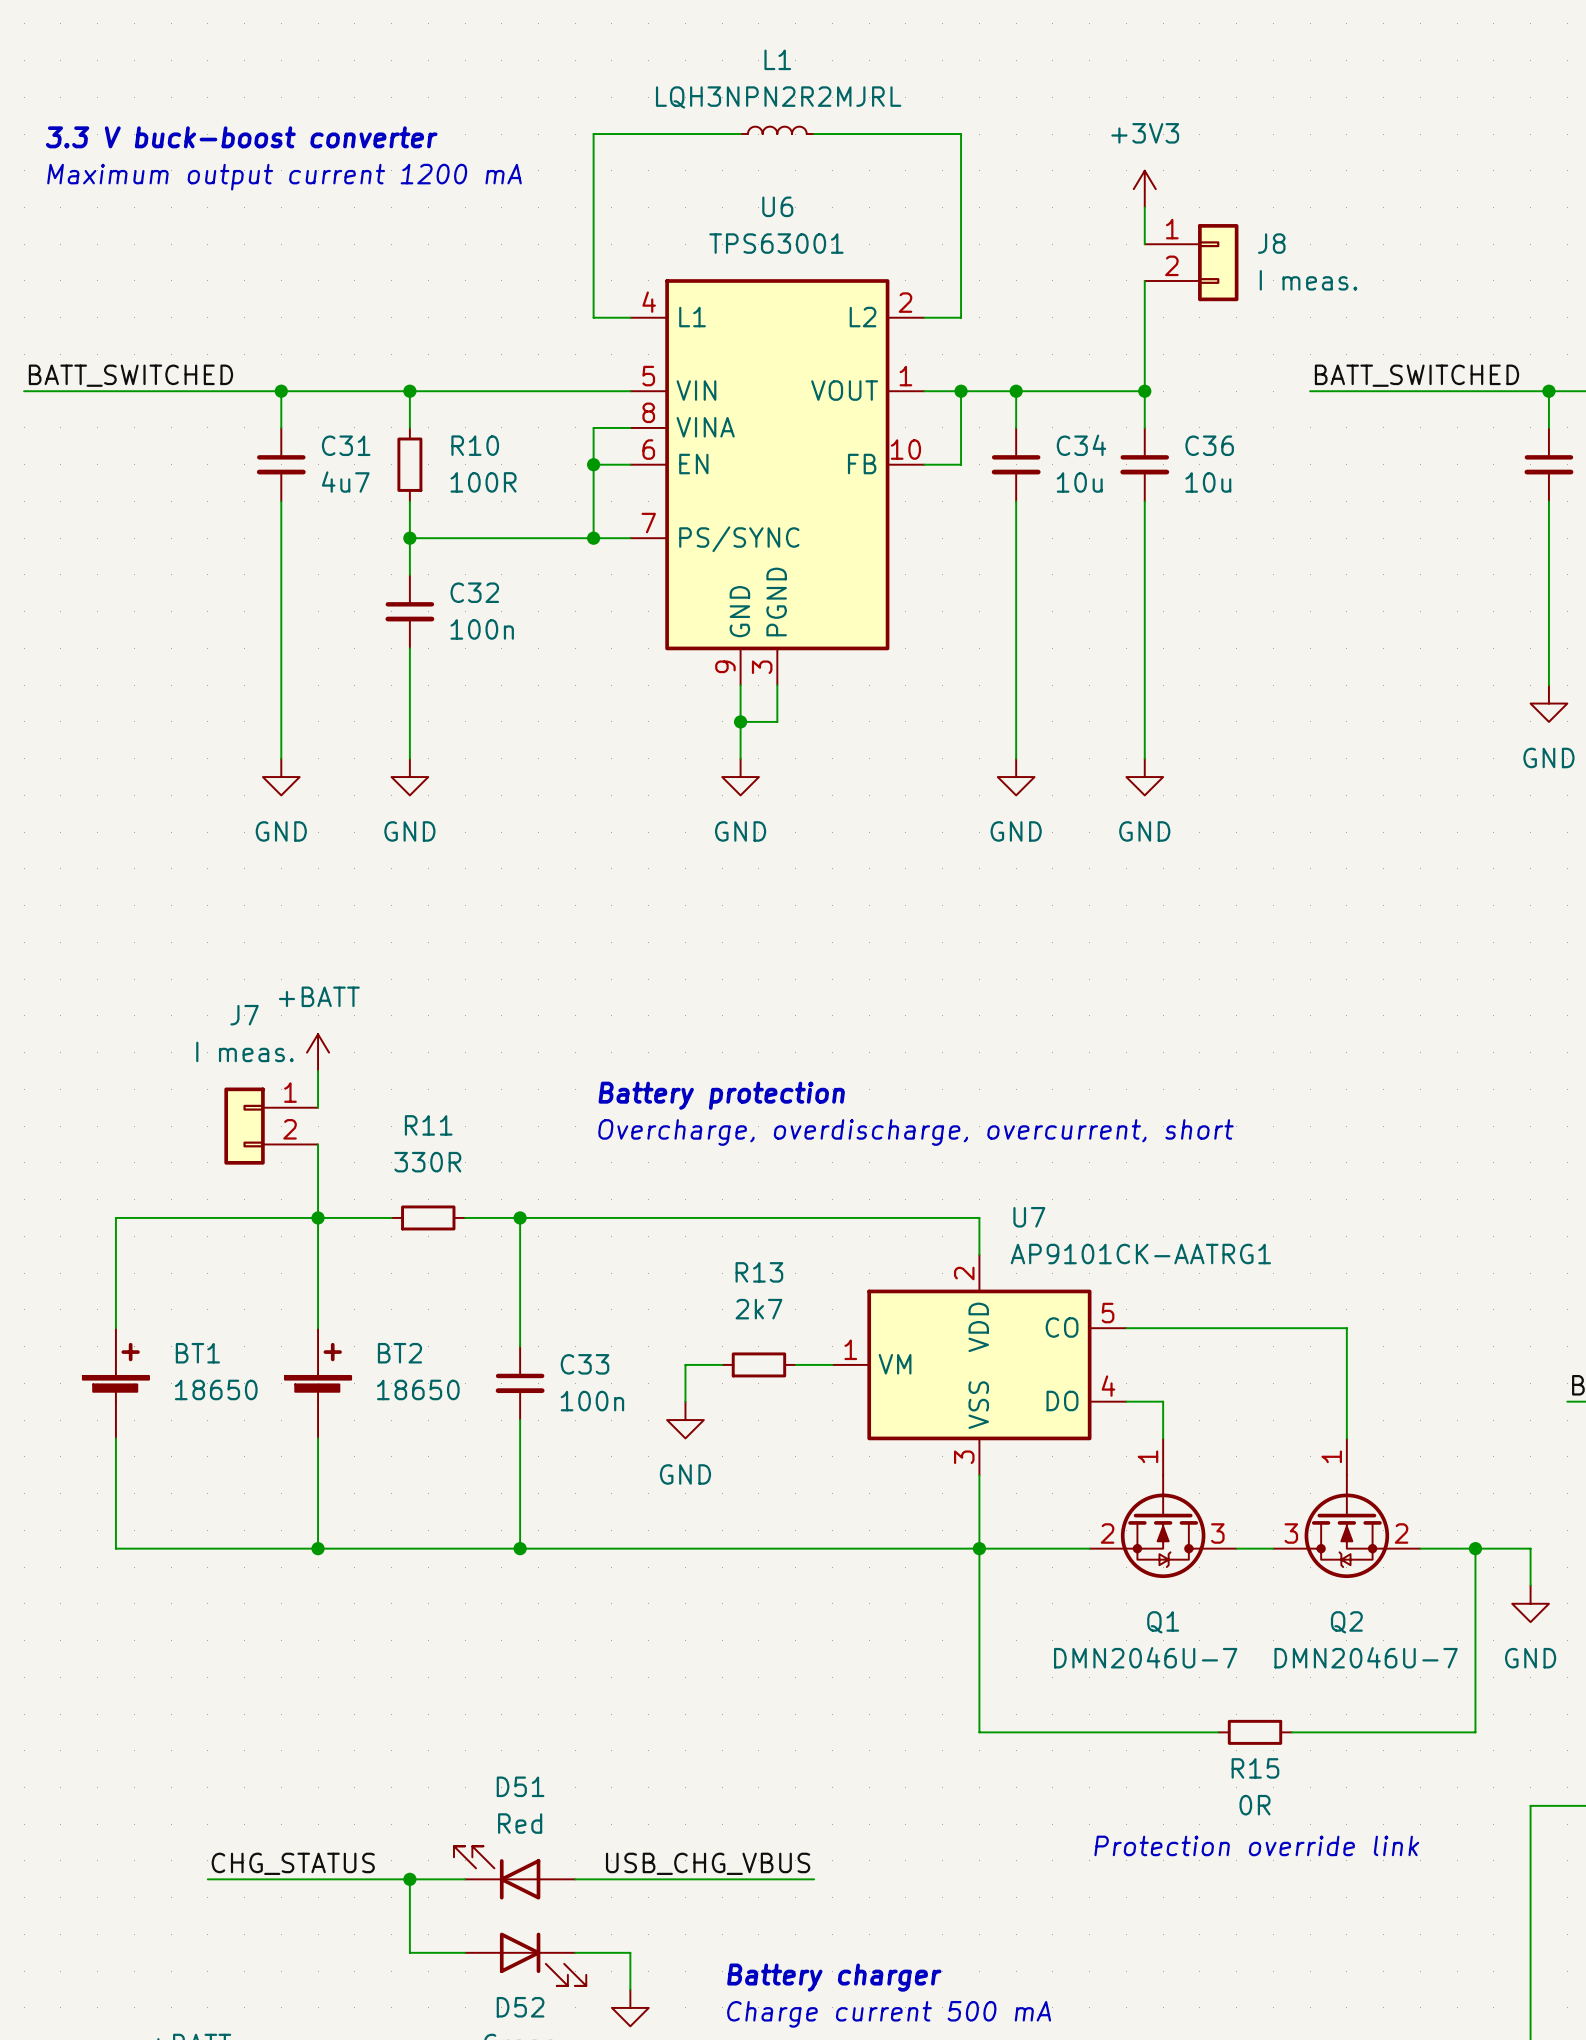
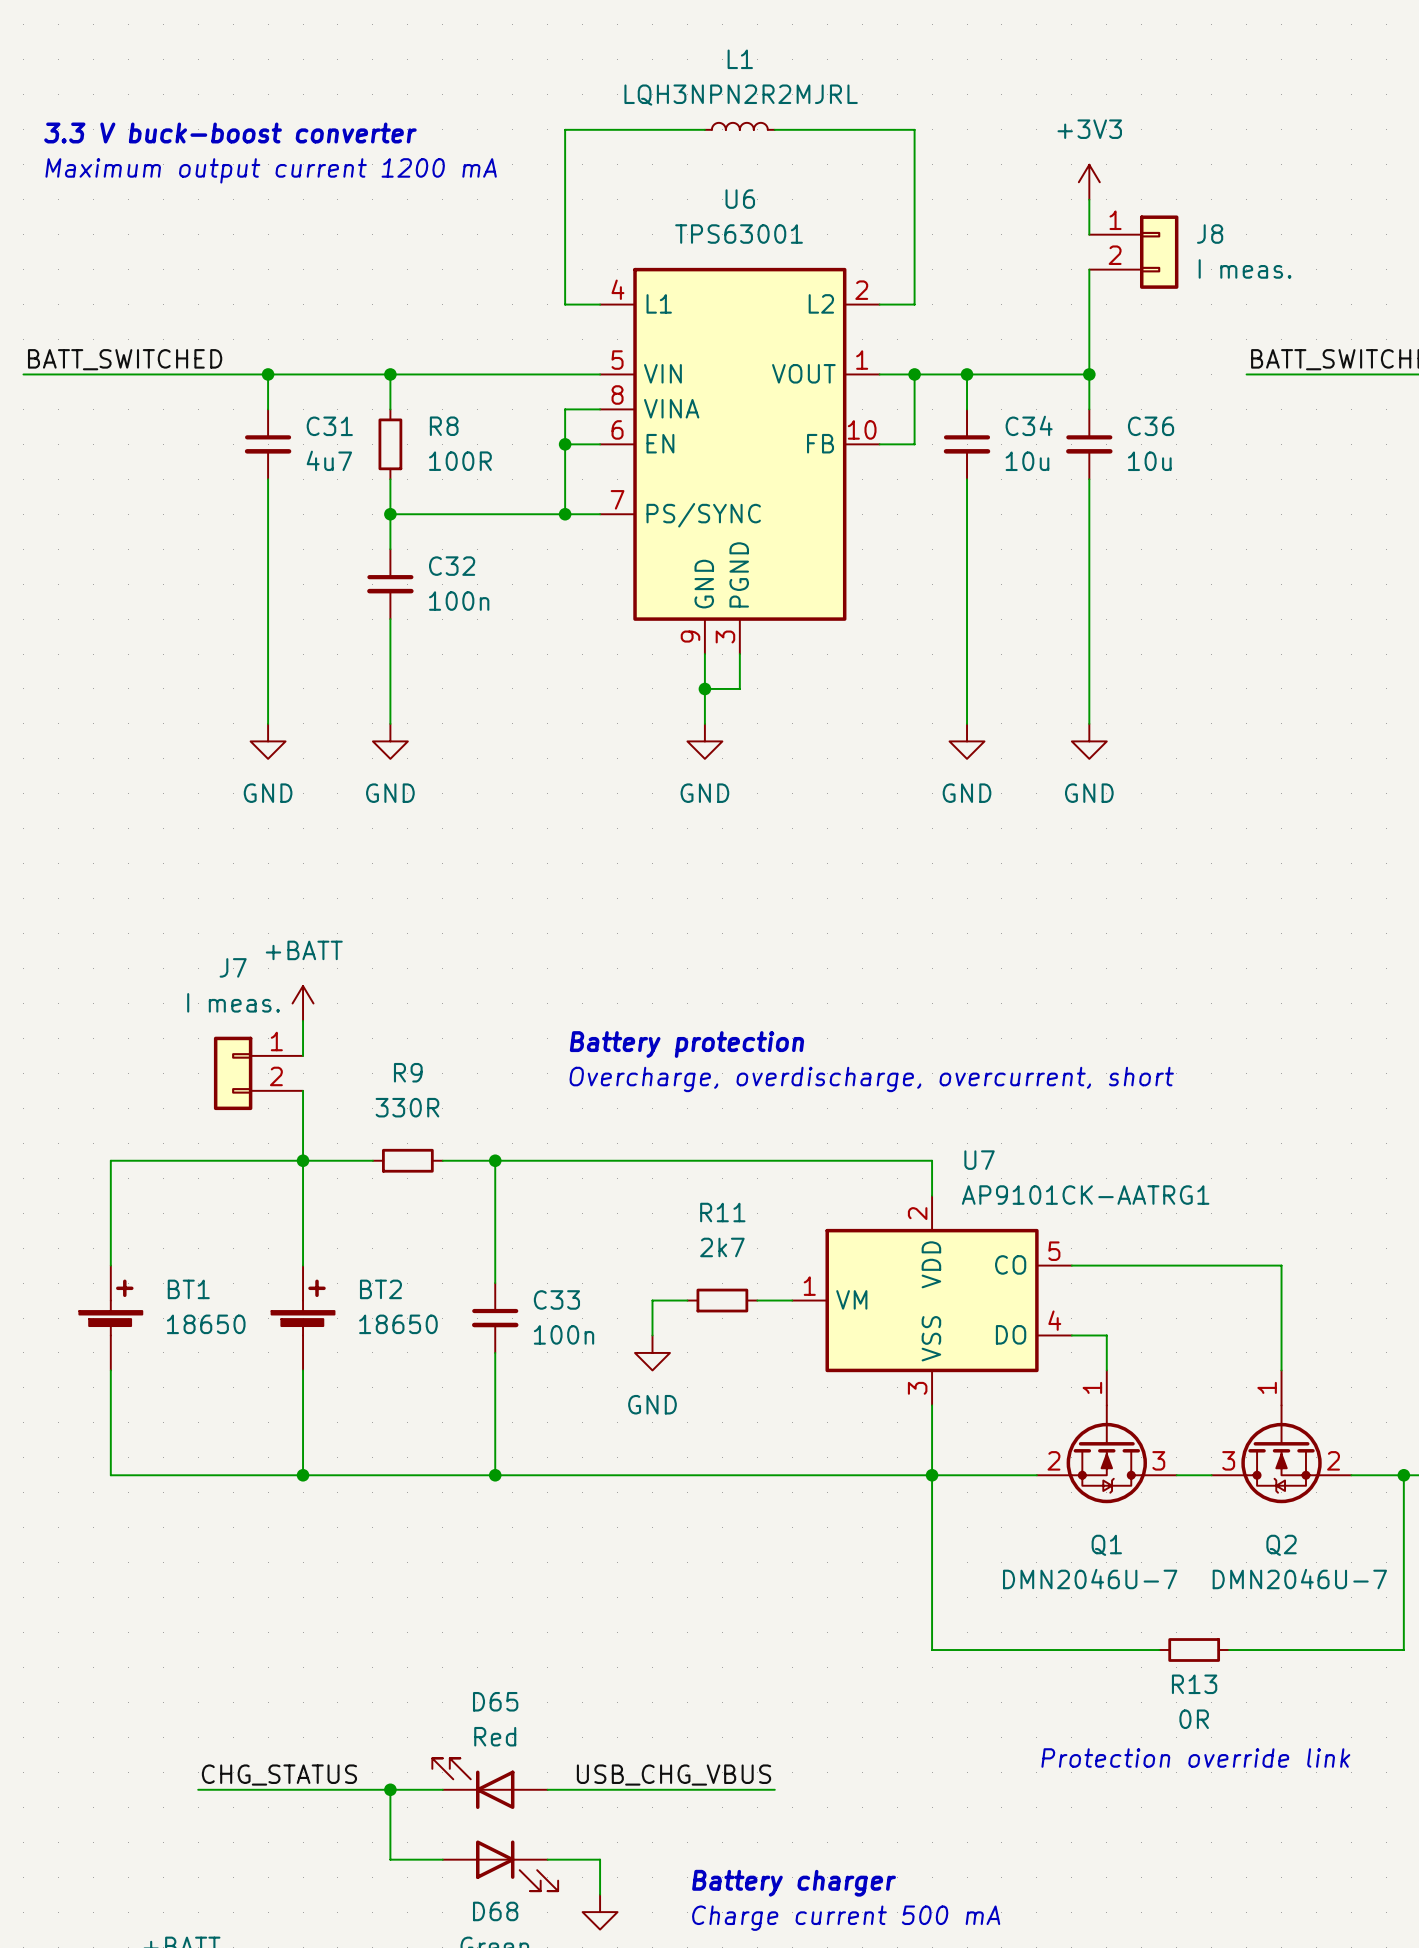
R10 name: R10 (475, 445) -> R8 (444, 426)
R11 name: R11 (428, 1125) -> R9 (408, 1072)
R13 name: R13 (759, 1272) -> R11 (722, 1212)
R15 name: R15 (1255, 1768) -> R13 (1194, 1684)
D51 name: D51 (520, 1786) -> D65 (495, 1701)
D52 name: D52 (520, 2007) -> D68 (495, 1911)

